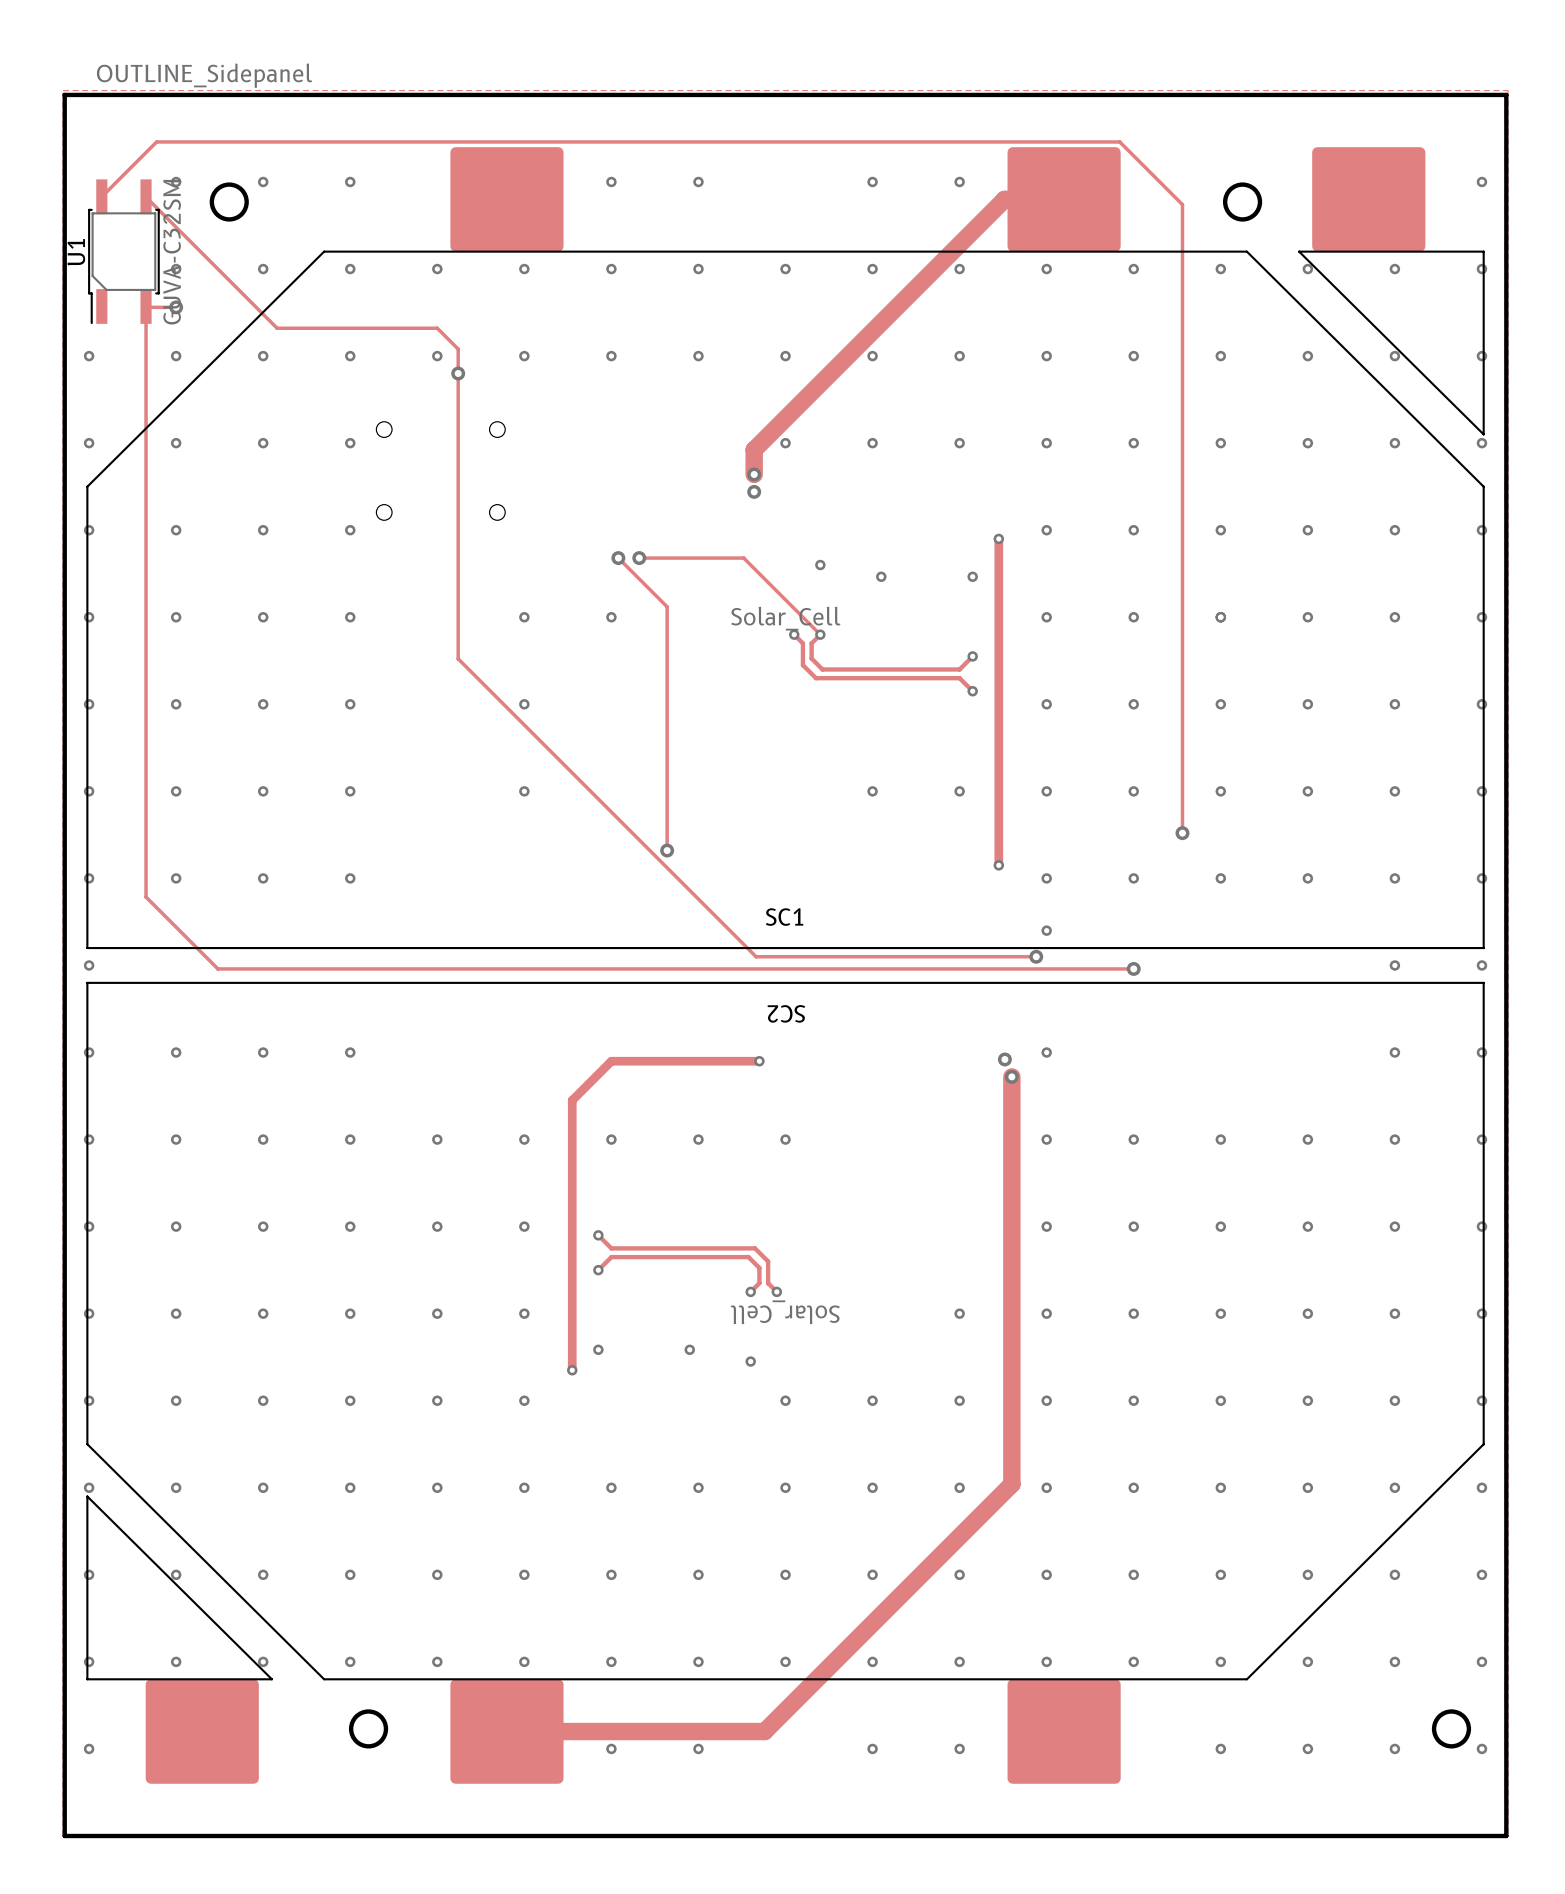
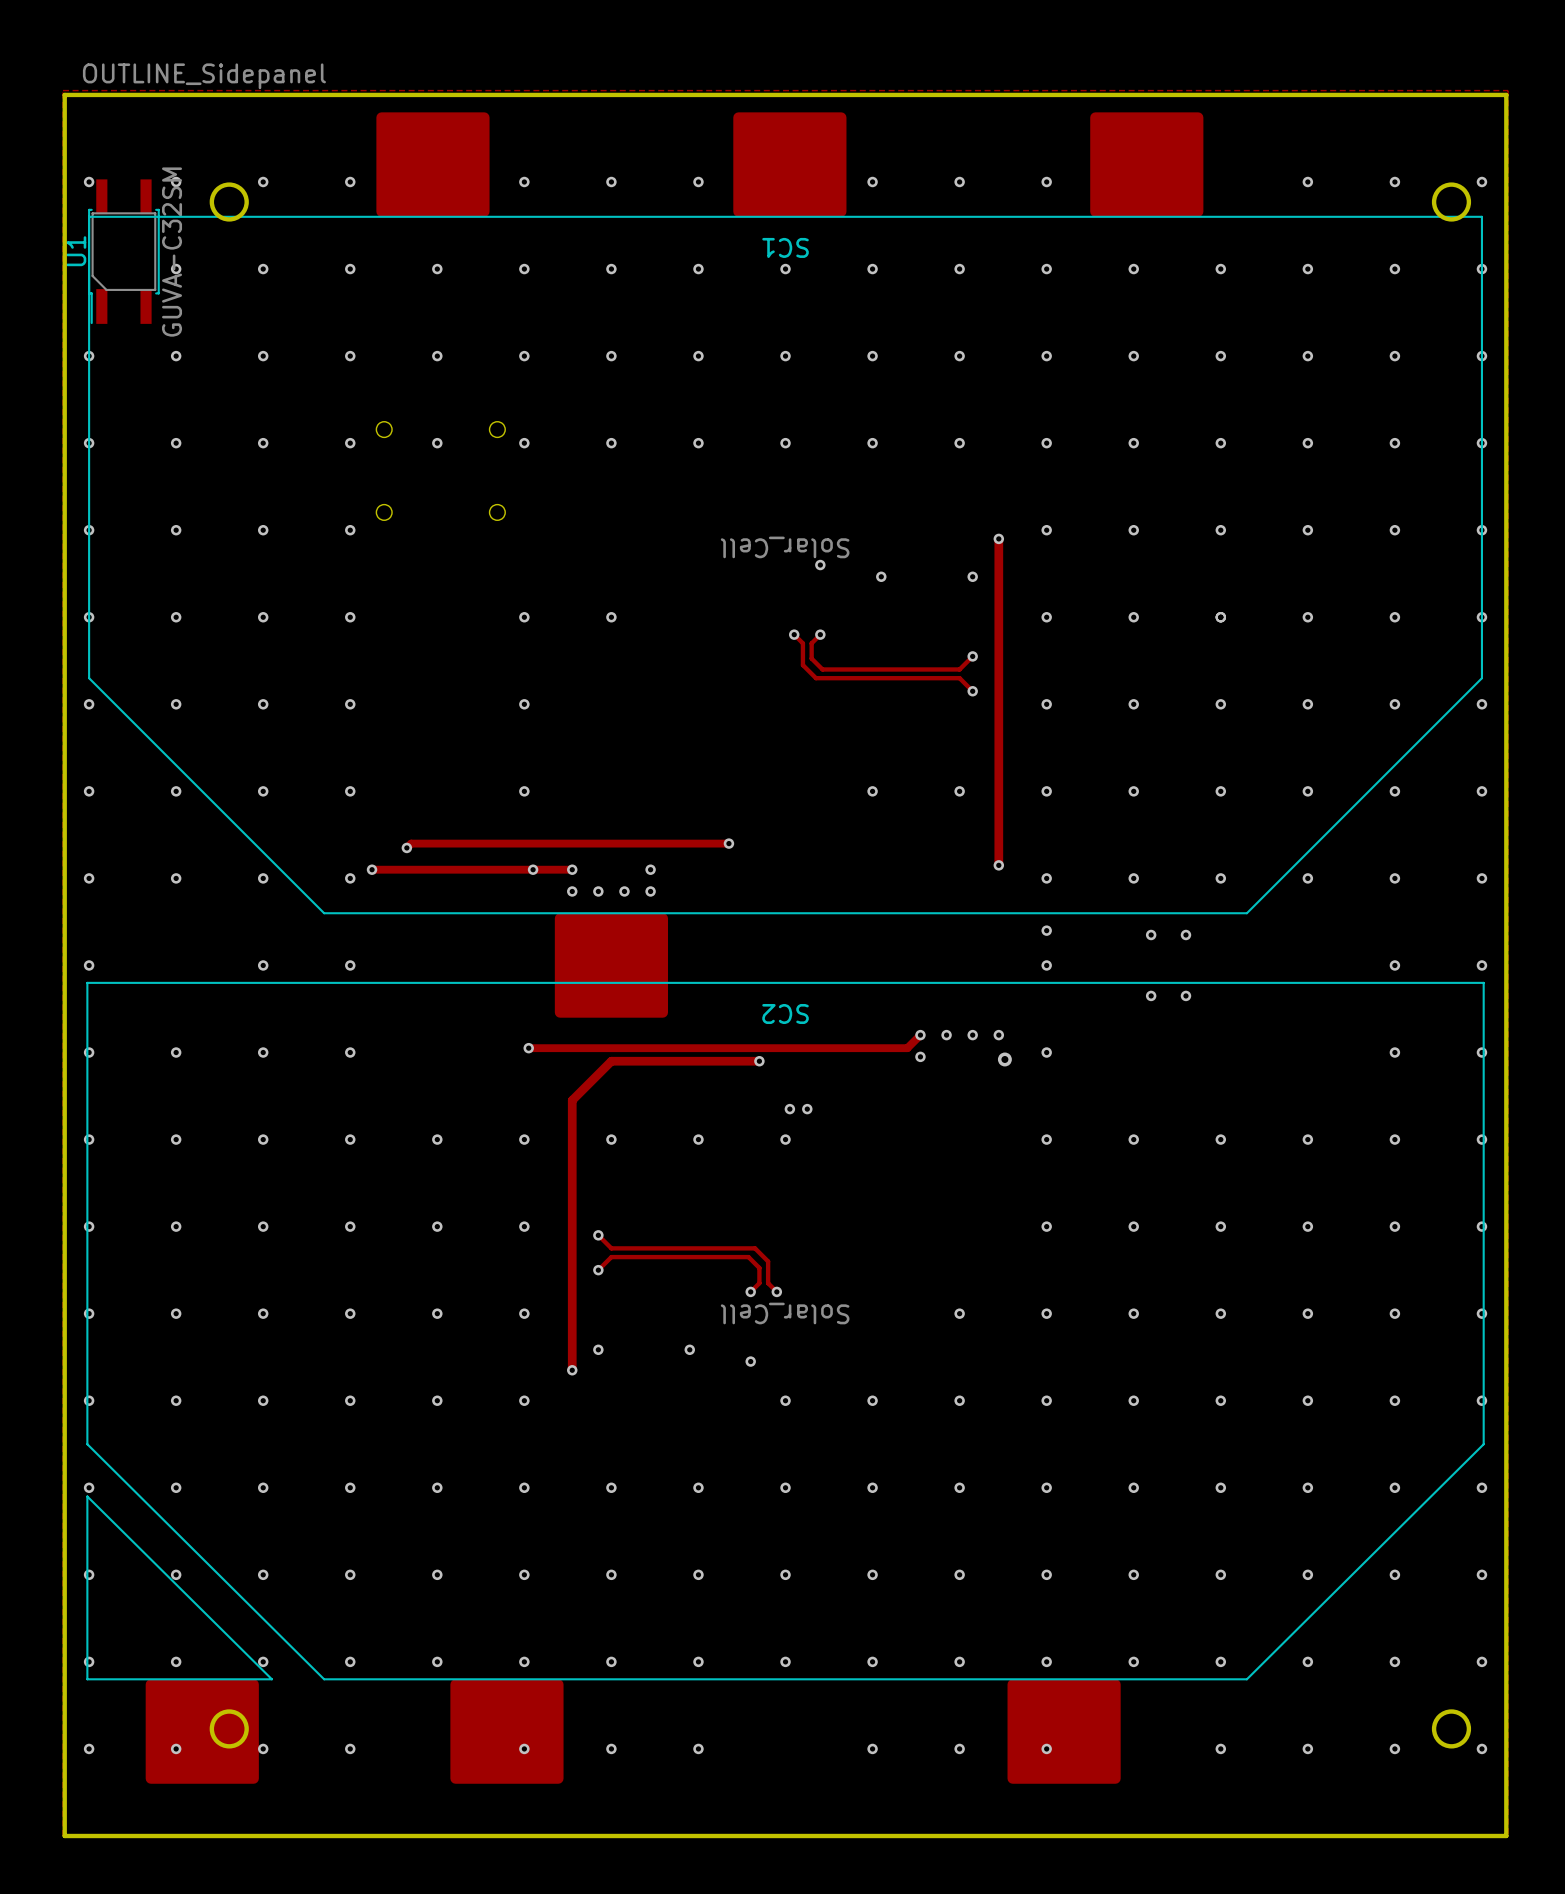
drawing shape: [62, 63, 1509, 1839] -> [62, 63, 1509, 1839]
SC1 footprint: [86, 147, 1485, 950] -> [88, 112, 1483, 1018]
via: none -> (89, 181)
via: none -> (524, 181)
via: none -> (1046, 181)
via: none -> (1307, 181)
via: none -> (1394, 181)
track: (101, 196) (156, 141) (1119, 141) (1182, 204) (1182, 833) -> none
track: (146, 197) (277, 328) (437, 328) (458, 349) (458, 658) (756, 956) (1036, 956) -> none
track: (1064, 199) (1004, 199) (754, 449) (754, 474) -> none
track: (176, 307) (146, 306) (146, 897) (217, 968) (1133, 968) -> none
via: (176, 307) -> none
via: (458, 373) -> none
via: none -> (437, 443)
via: none -> (524, 443)
via: none -> (611, 443)
via: none -> (698, 443)
via: (754, 474) -> none
via: (754, 491) -> none
track: (618, 558) (667, 606) (667, 850) -> none
via: (618, 558) -> none
track: (639, 558) (743, 558) (820, 634) -> none
via: (639, 558) -> none
SC1 value position: Solar_Cell (785, 618) -> Solar_Cell (785, 547)
via: (1182, 833) -> none
track: none -> (728, 843) (411, 843) (406, 847)
via: none -> (728, 843)
via: none -> (406, 847)
via: (667, 850) -> none
track: none -> (372, 869) (572, 869)
via: none -> (372, 869)
via: none -> (533, 869)
via: none -> (572, 869)
via: none -> (650, 869)
via: none -> (572, 891)
via: none -> (598, 891)
via: none -> (624, 891)
via: none -> (650, 891)
SC1 name position: SC1 (784, 917) -> SC1 (785, 247)
via: none -> (1151, 935)
via: none -> (1185, 935)
via position: (1036, 956) -> (1046, 965)
via: none -> (263, 965)
via: none -> (350, 965)
via: (1133, 968) -> none
via: none -> (1151, 995)
via: none -> (1185, 995)
track: none -> (920, 1035) (907, 1048) (528, 1048)
via: none -> (920, 1035)
via: none -> (946, 1035)
via: none -> (972, 1035)
via: none -> (998, 1035)
via: none -> (528, 1048)
via: none -> (920, 1056)
track: (1011, 1076) (1011, 1484) (764, 1731) (506, 1731) -> none
via: (1011, 1076) -> none
via: none -> (789, 1109)
via: none -> (807, 1109)
via: none -> (176, 1748)
via: none -> (263, 1748)
via: none -> (350, 1748)
via: none -> (524, 1748)
via: none -> (1046, 1748)

